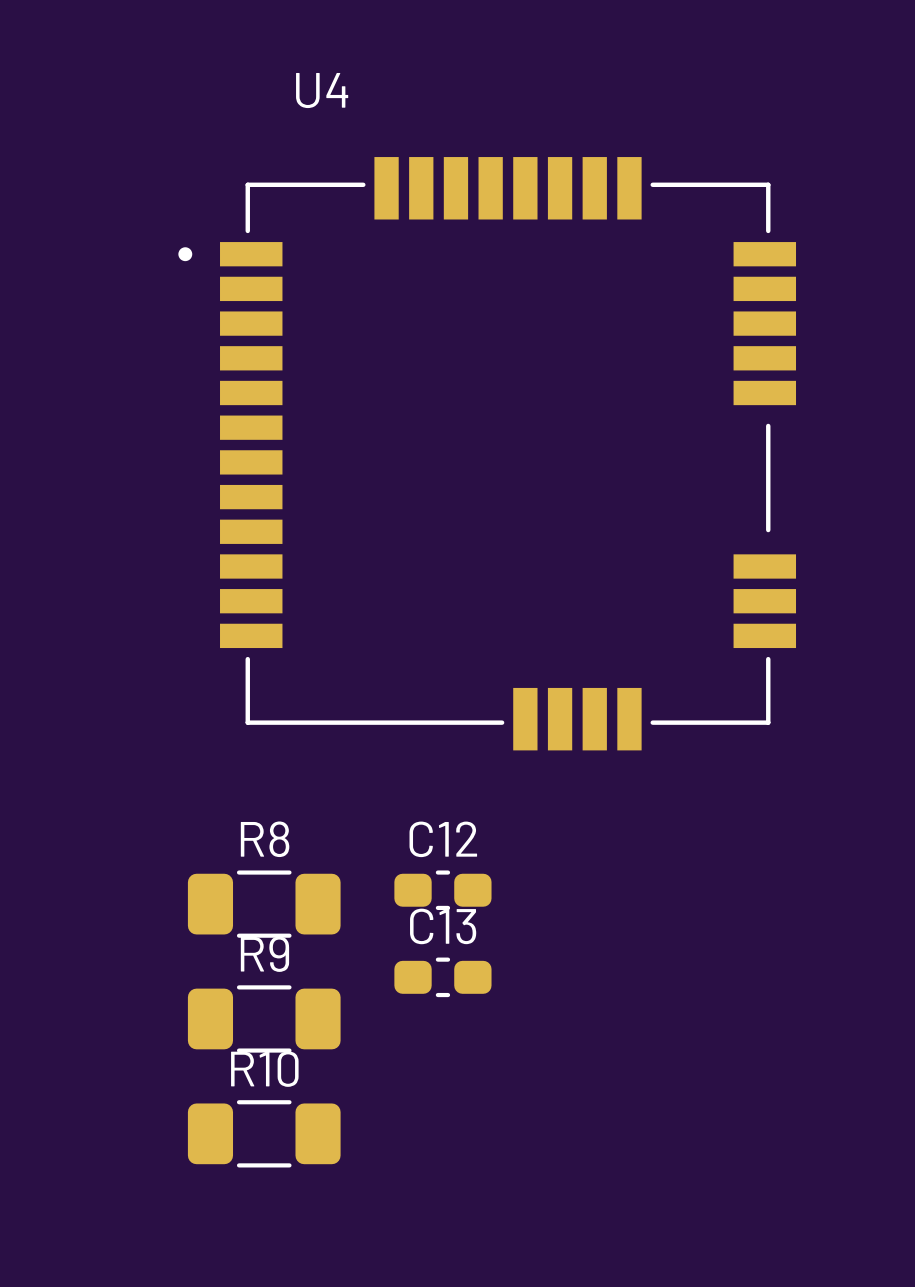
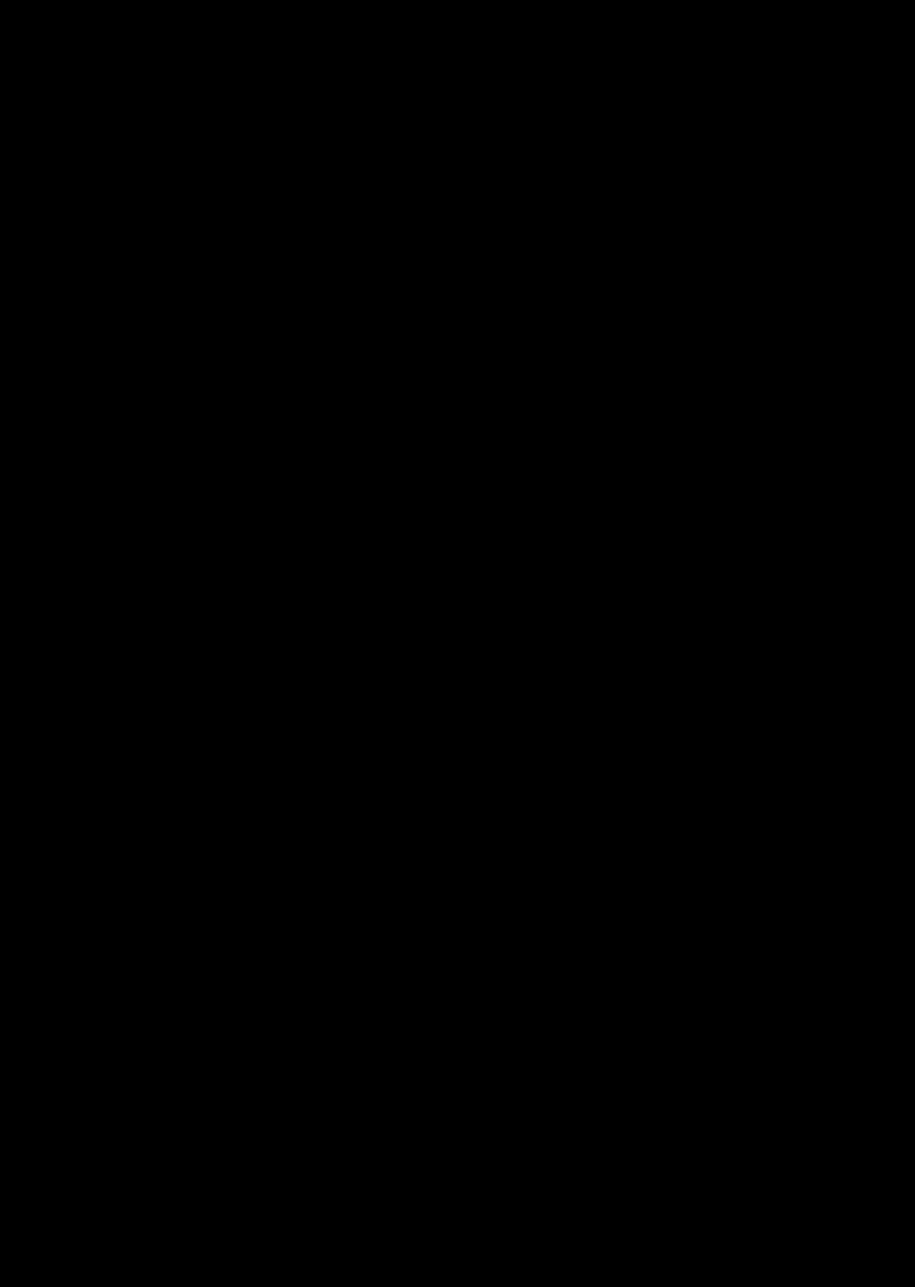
U4: (487, 453) -> none
C12: (442, 890) -> none
R8: (264, 904) -> none
C13: (442, 977) -> none
R9: (264, 1018) -> none
R10: (264, 1133) -> none

